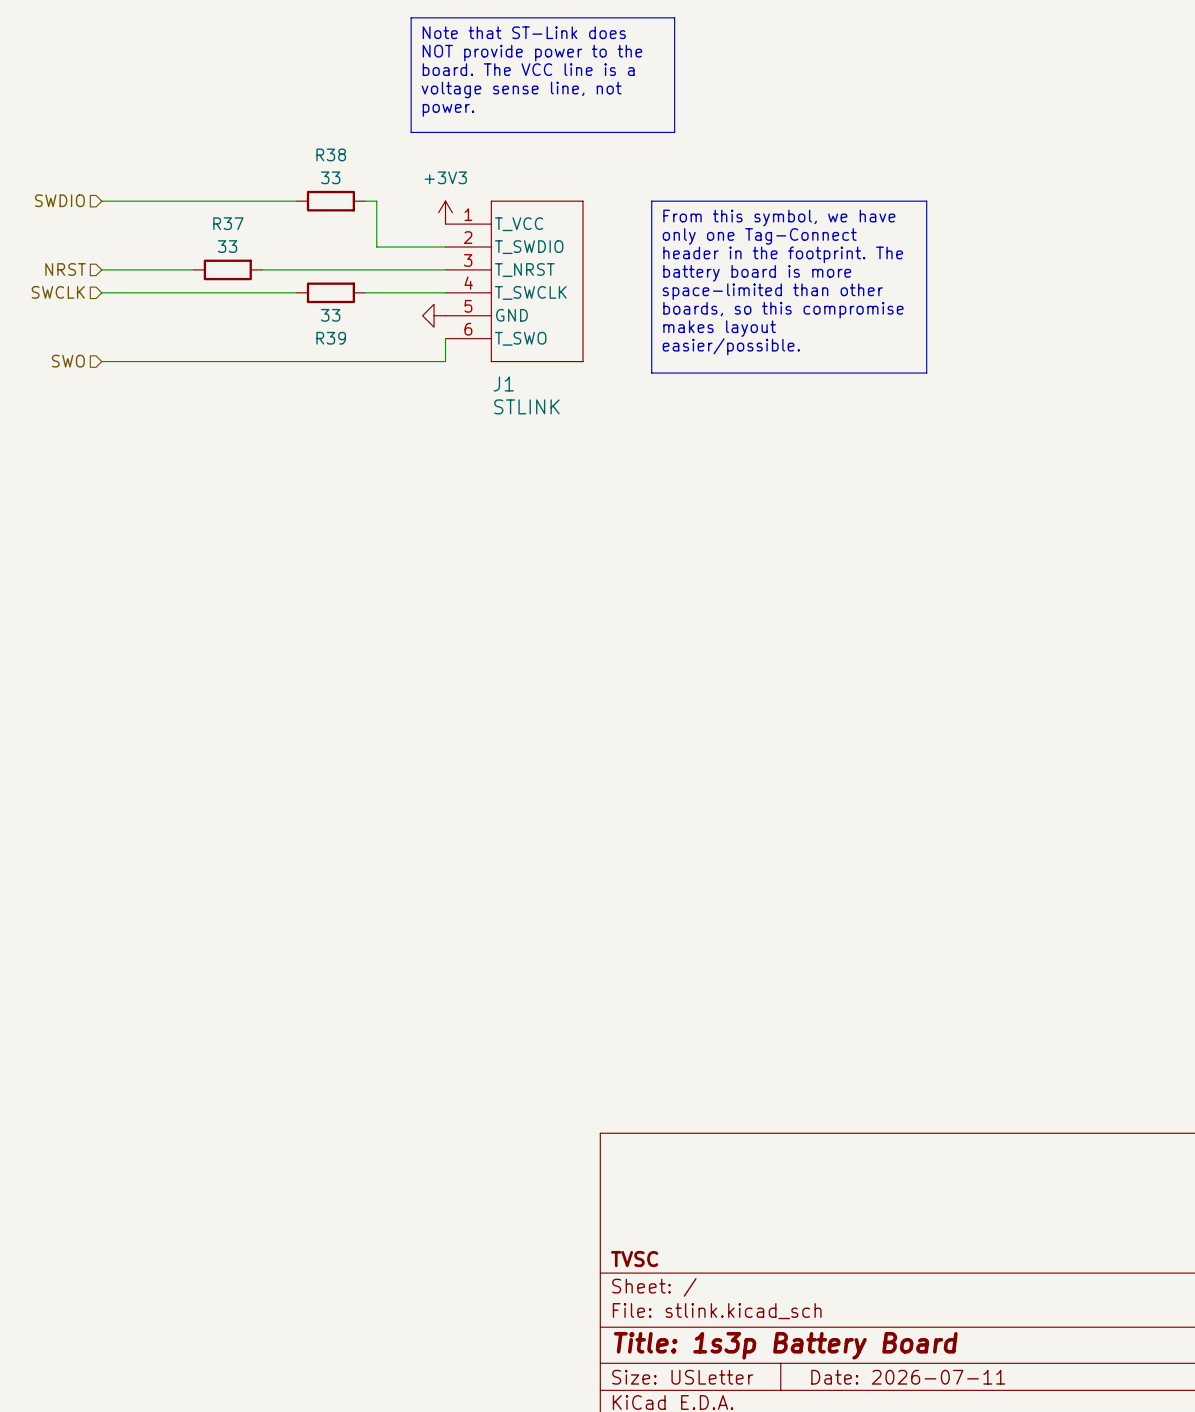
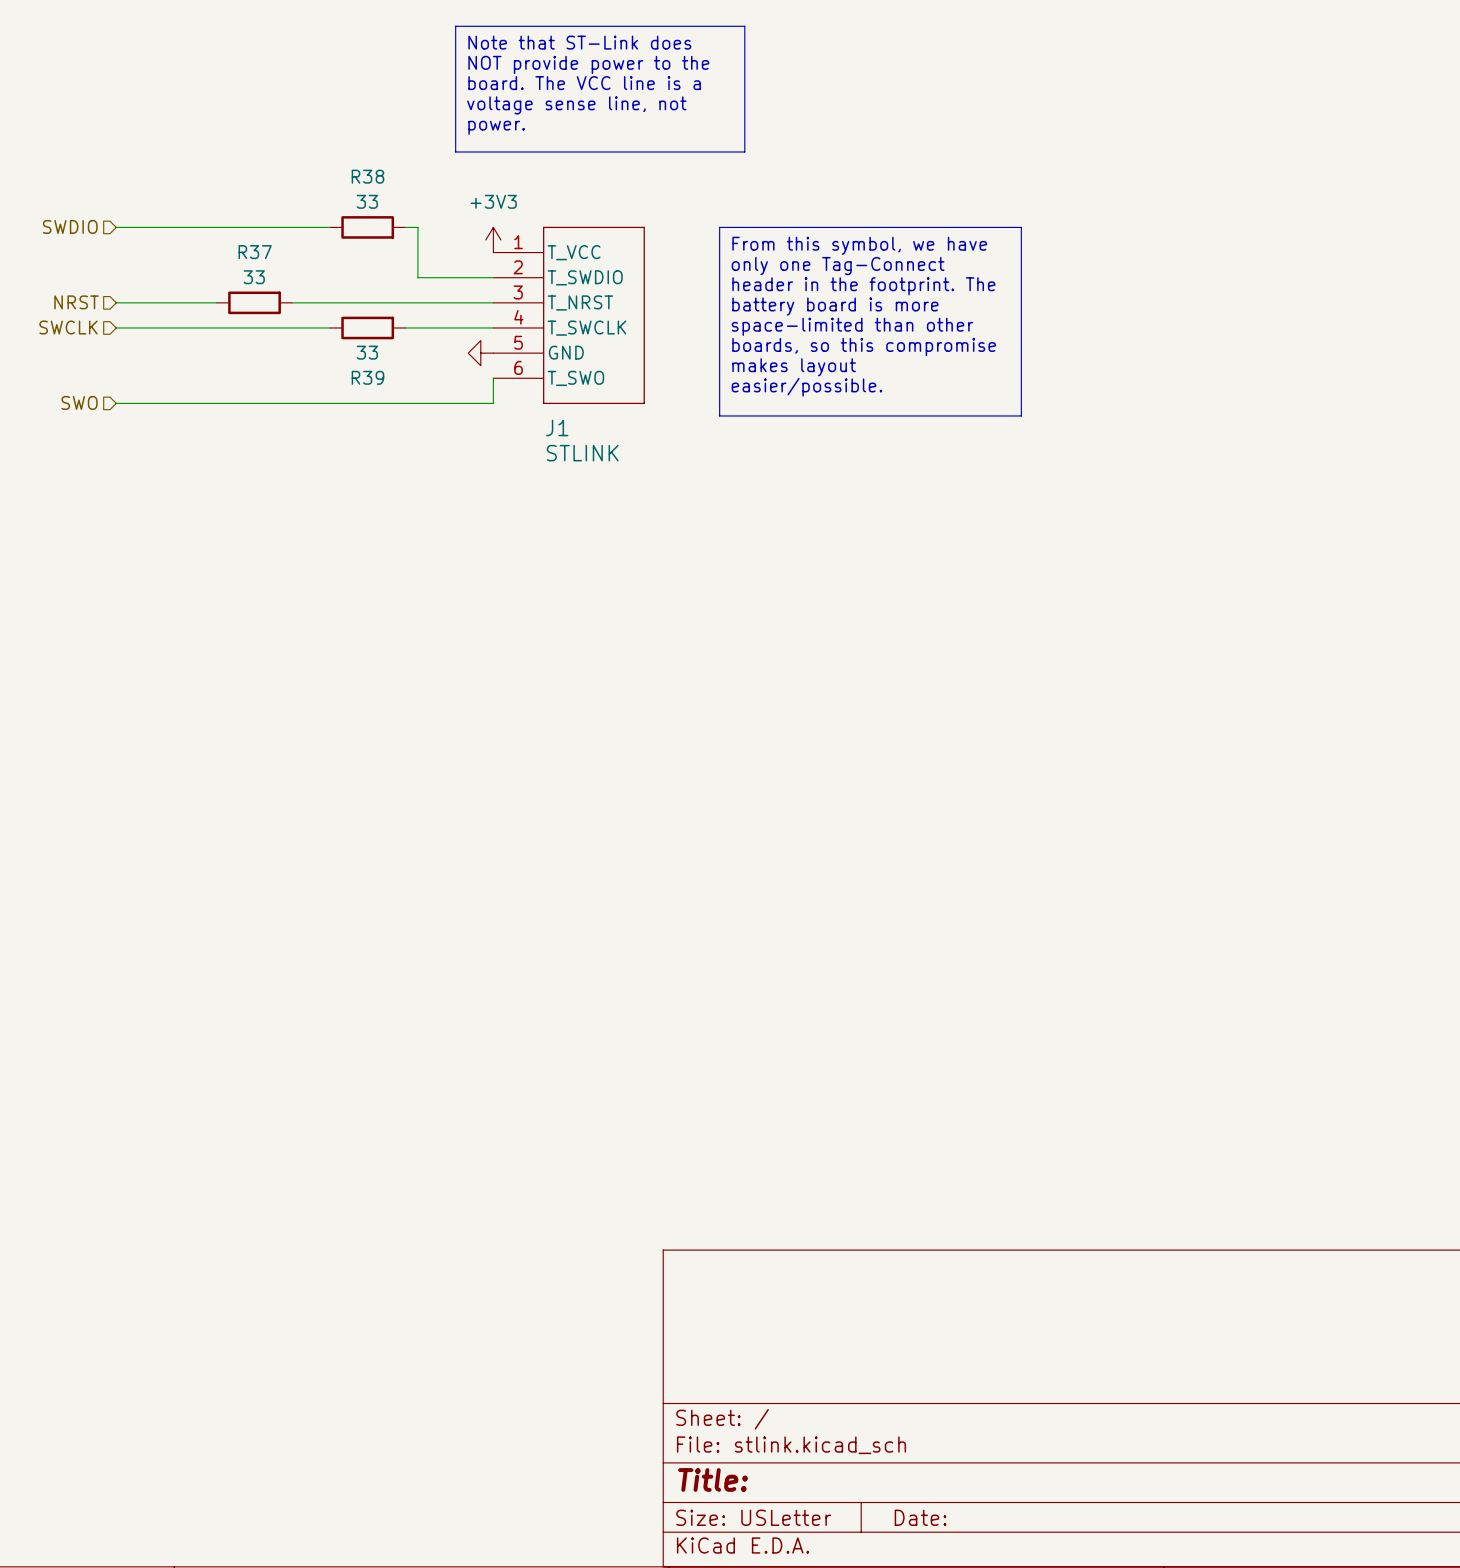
title block: TVSC (634, 1259) -> none
title block: Title: 1s3p Battery Board (785, 1345) -> Title: (713, 1479)
title block: Date: 2026-07-11 (908, 1377) -> Date: (920, 1517)

